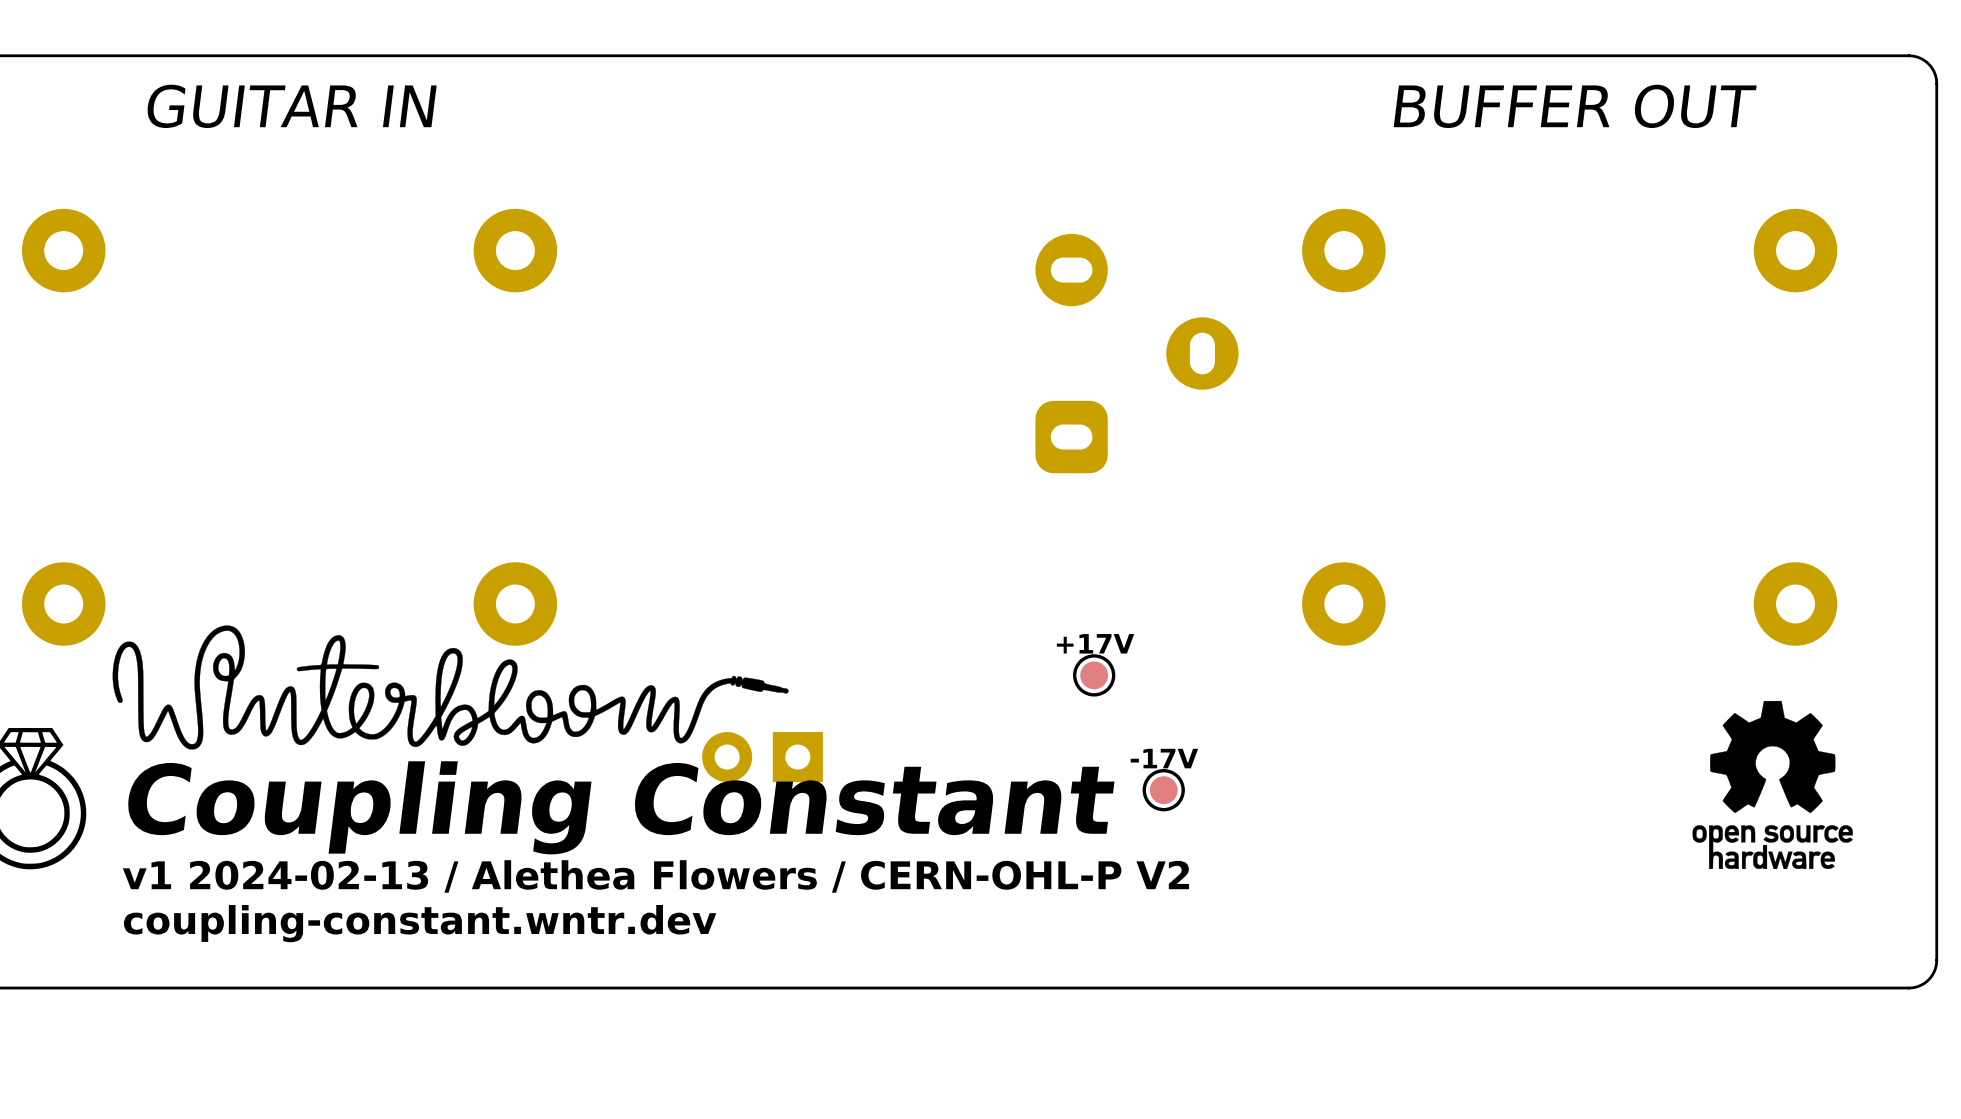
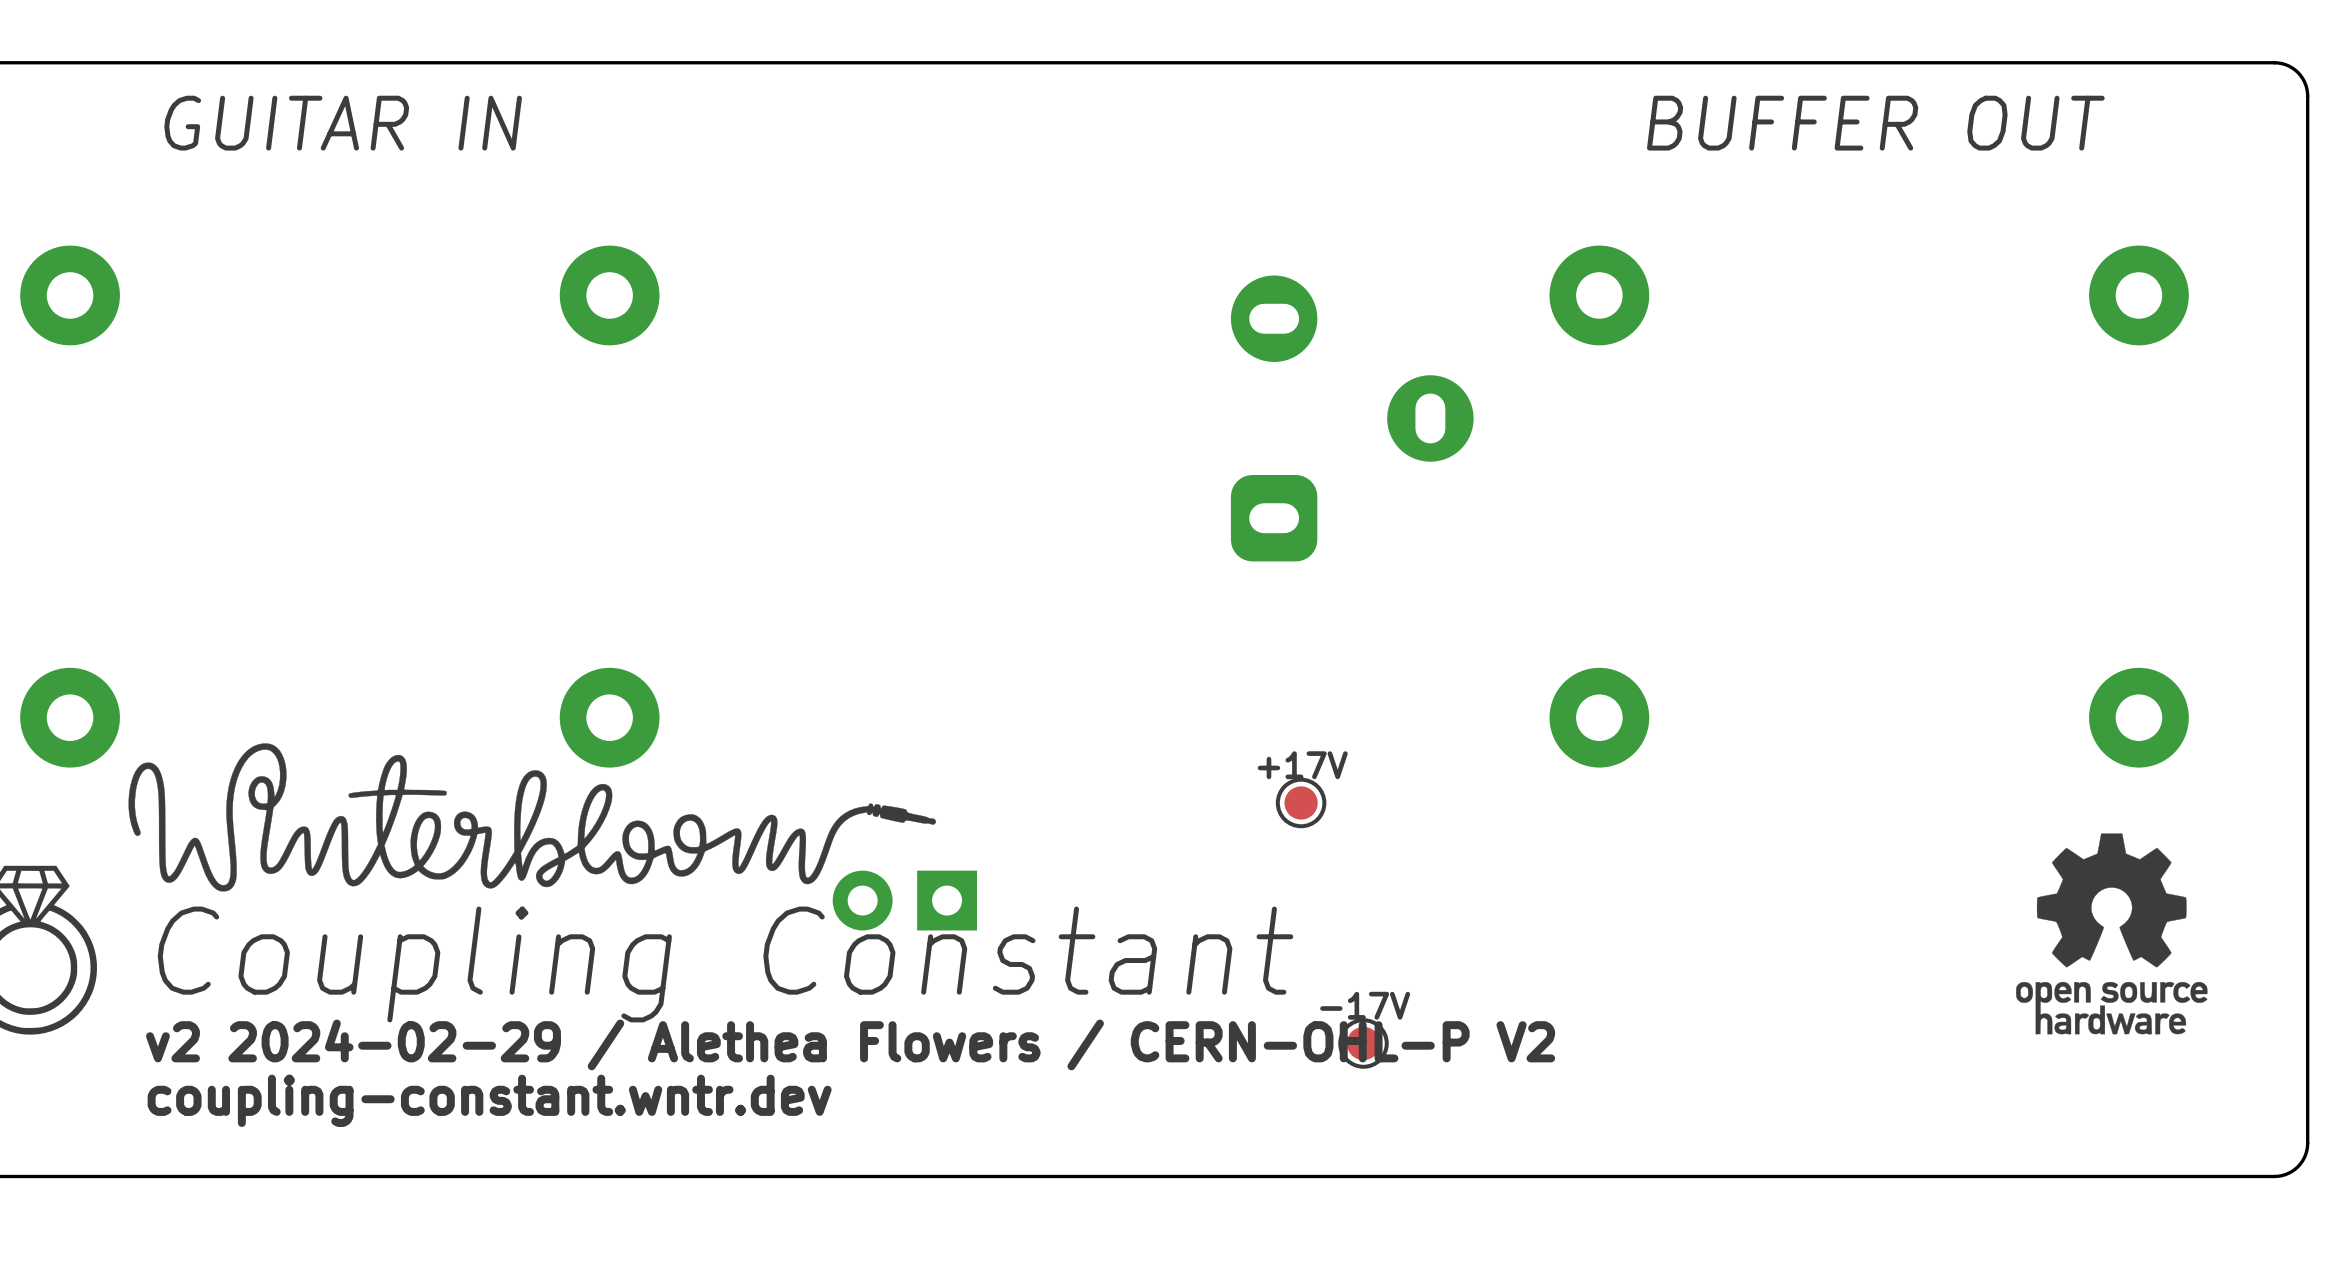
part position: (1163, 790) -> (1363, 1043)
text: v1 2024-02-13 / Alethea Flowers / CERN-OHL-P V2 (655, 876) -> v2 2024-02-29 / Alethea Flowers / CERN-OHL-P V2 (850, 1044)

